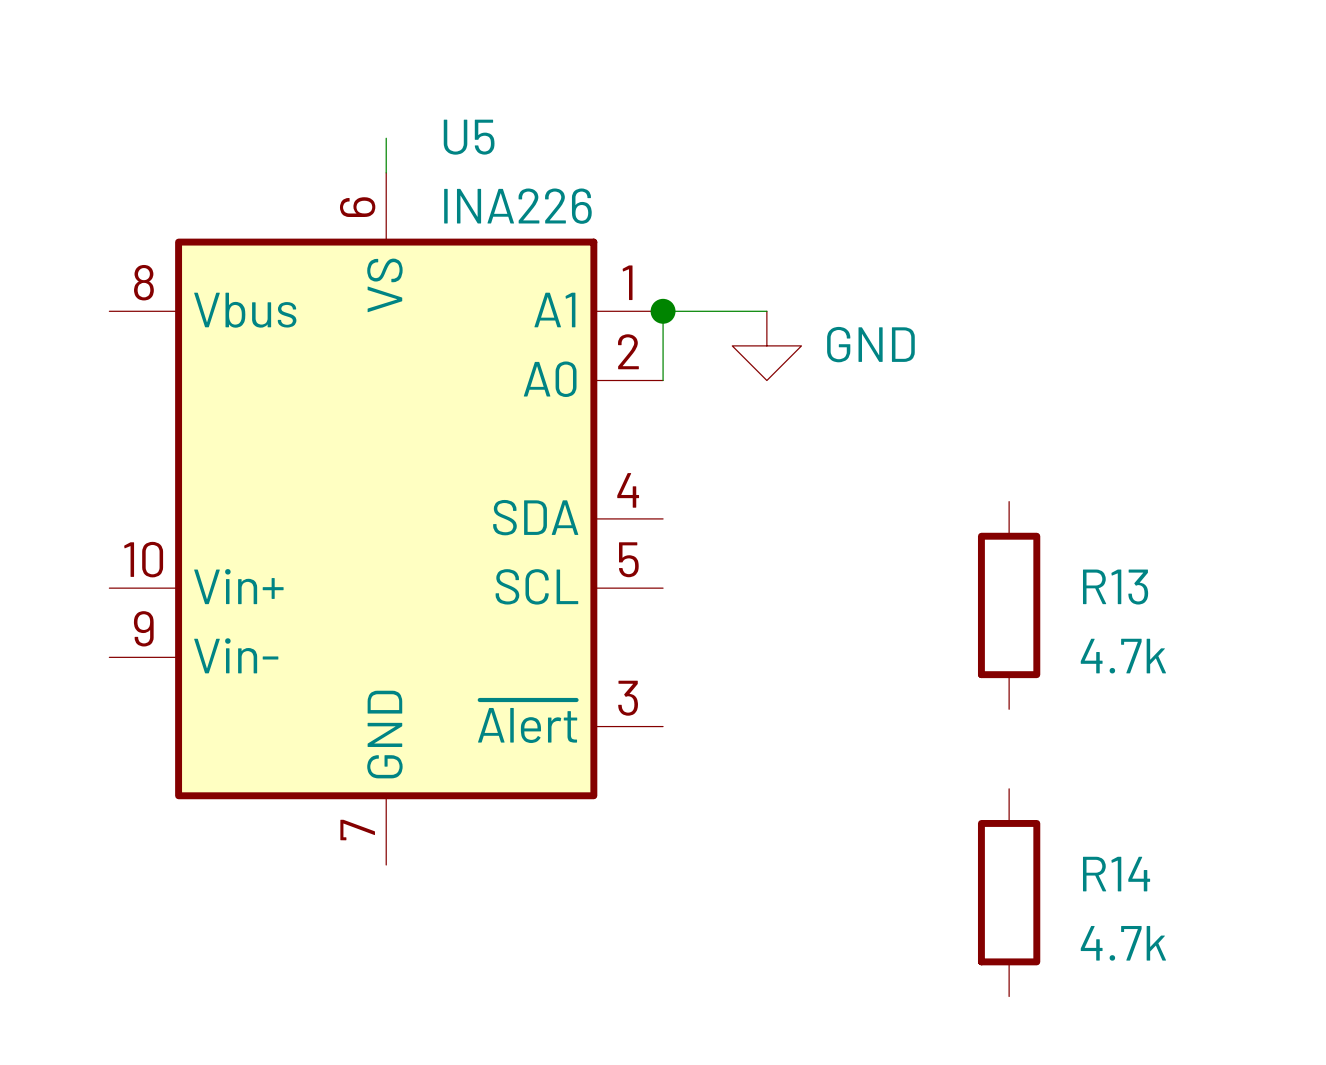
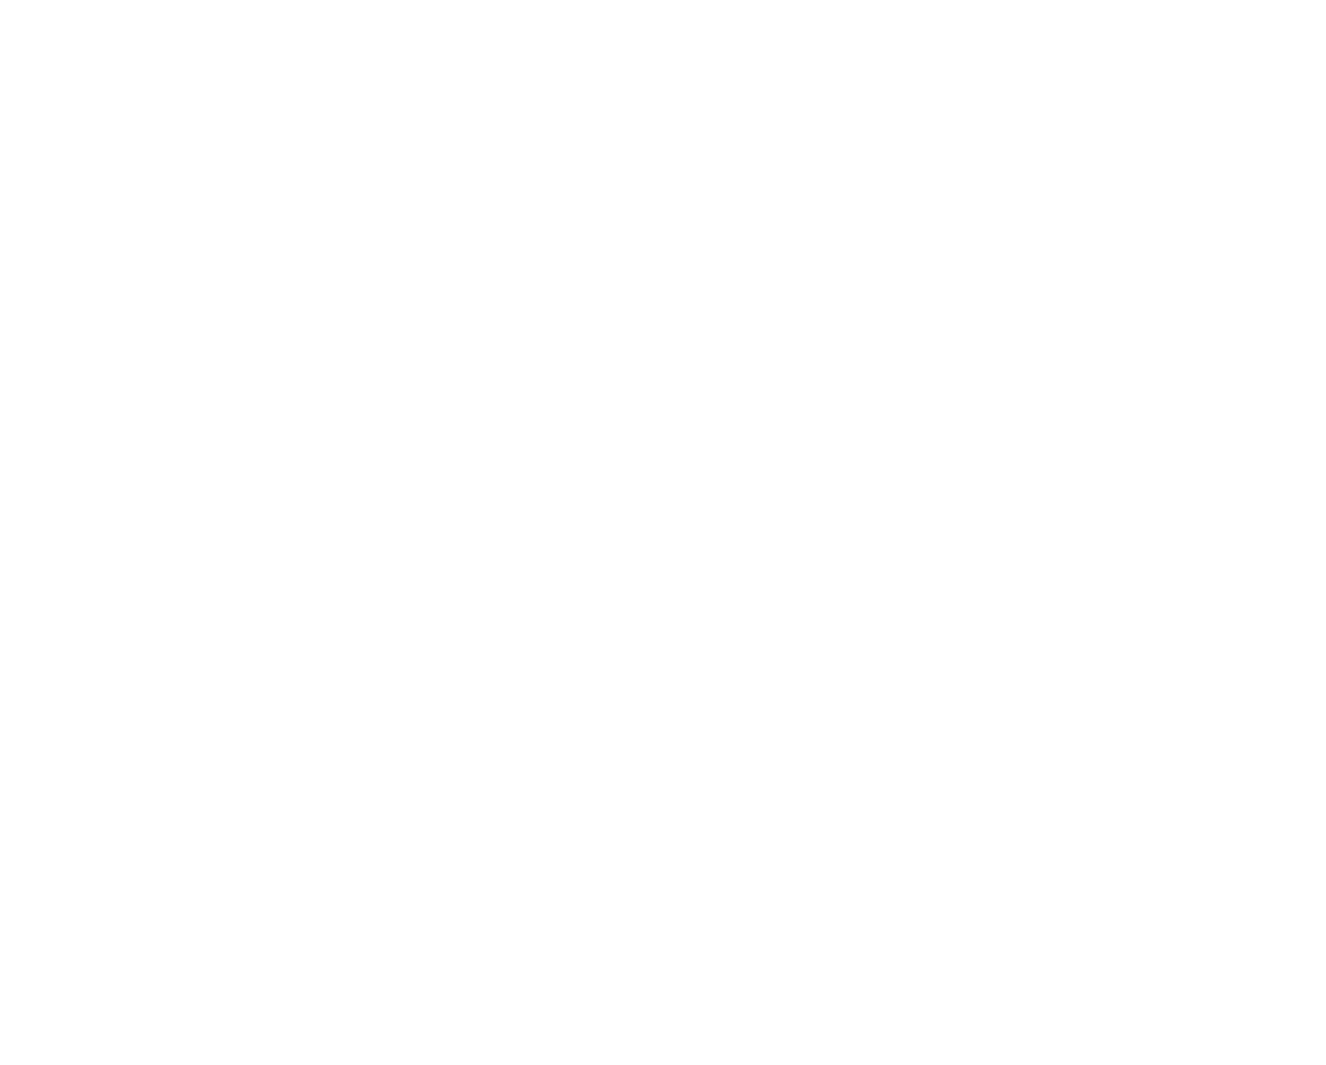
wire: (386, 138) (386, 172) -> none
junction: (663, 311) -> none
wire: (766, 311) (663, 311) (663, 380) -> none
power symbol: GND (766, 345) -> none
U5: INA226 (386, 518) -> none
R13: 4.7k (1009, 605) -> none
R14: 4.7k (1009, 892) -> none

